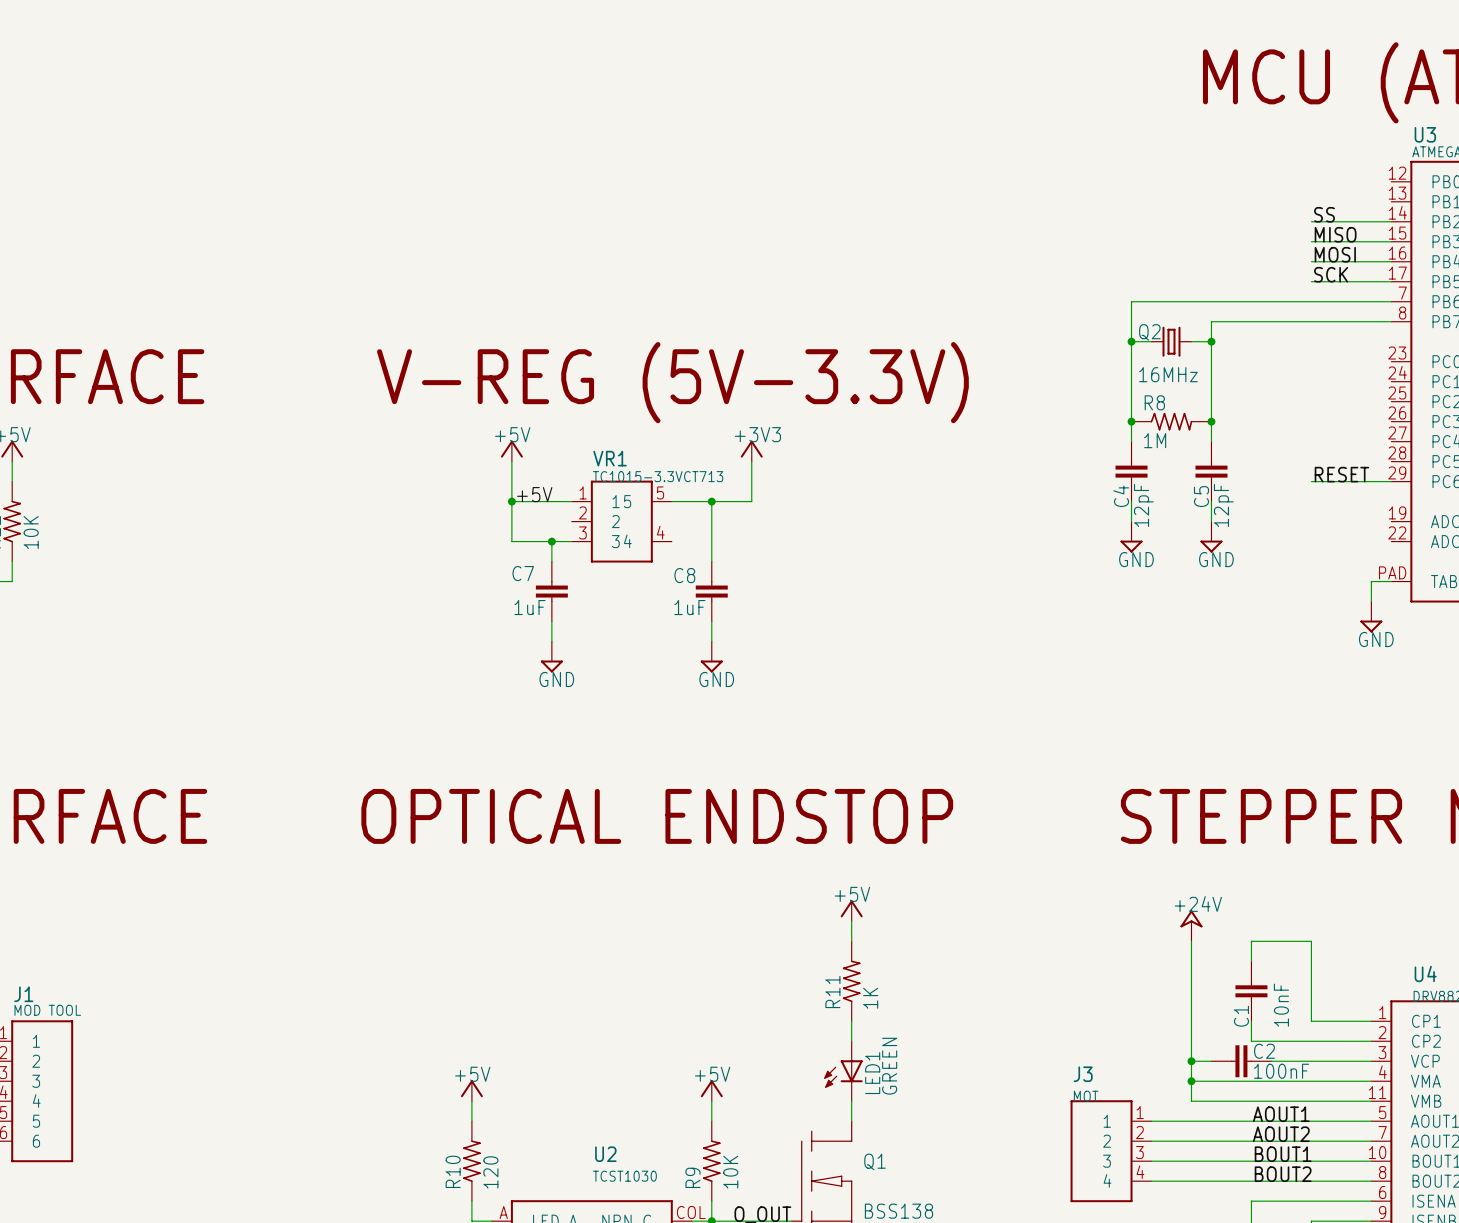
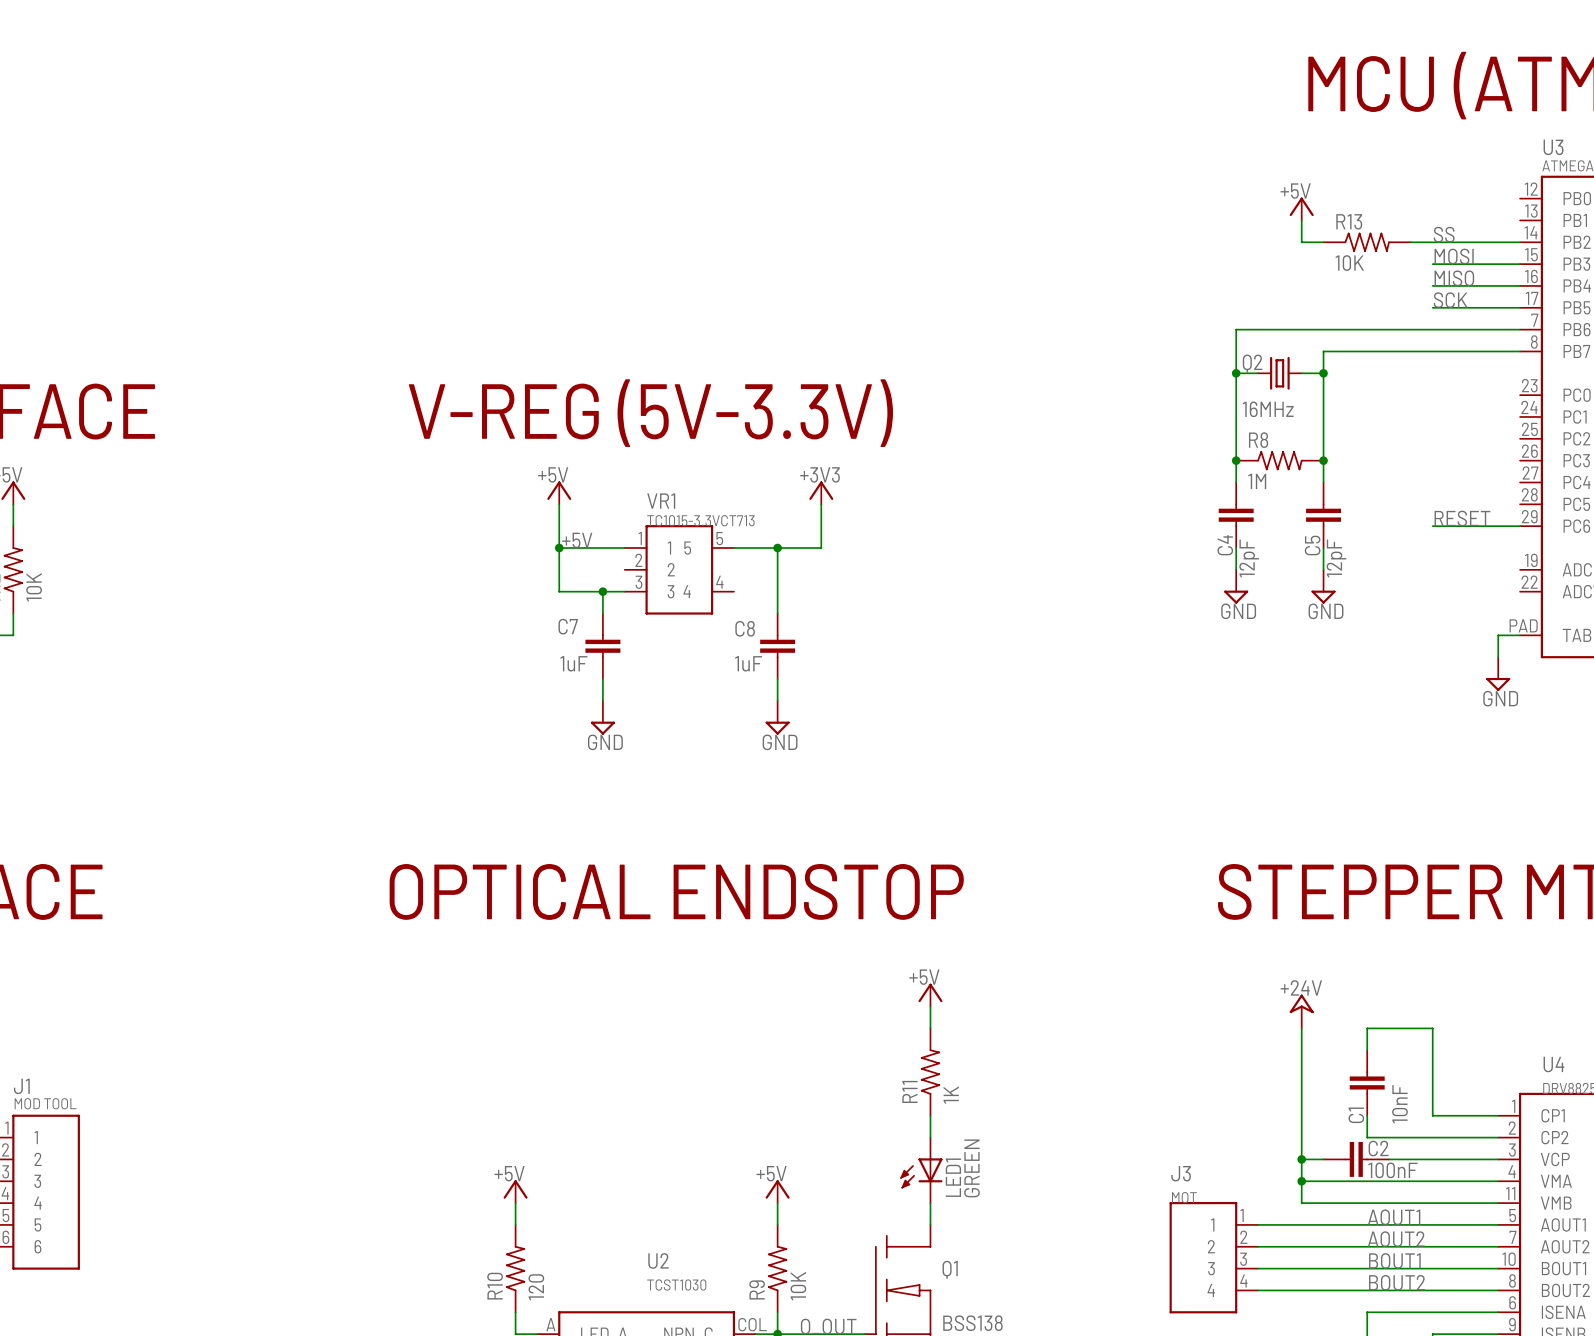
power symbol: none -> +5V (1301, 208)
wire: none -> (1301, 220) (1301, 242) (1323, 242)
R13: none -> 10K (1367, 242)
wire: none -> (1410, 242) (1432, 242)
label: MISO (1335, 234) -> MOSI (1454, 256)
label: MOSI (1335, 254) -> MISO (1454, 278)

